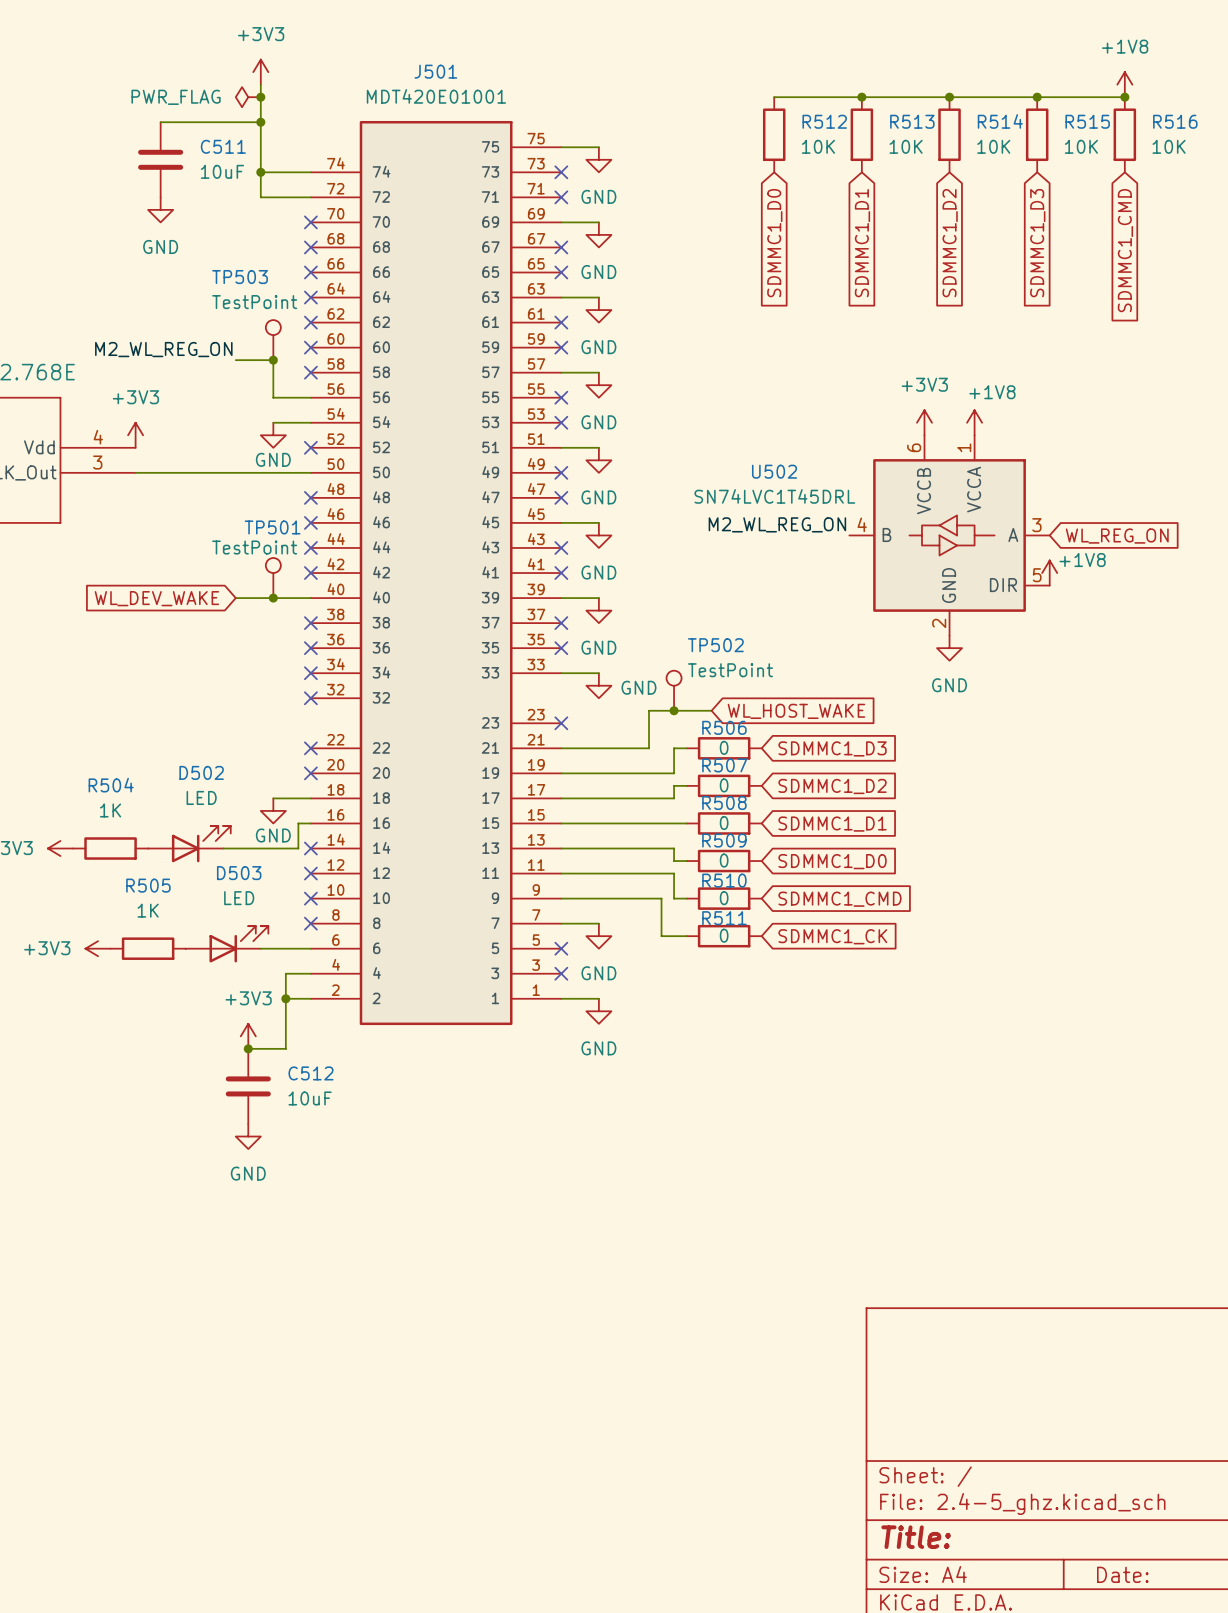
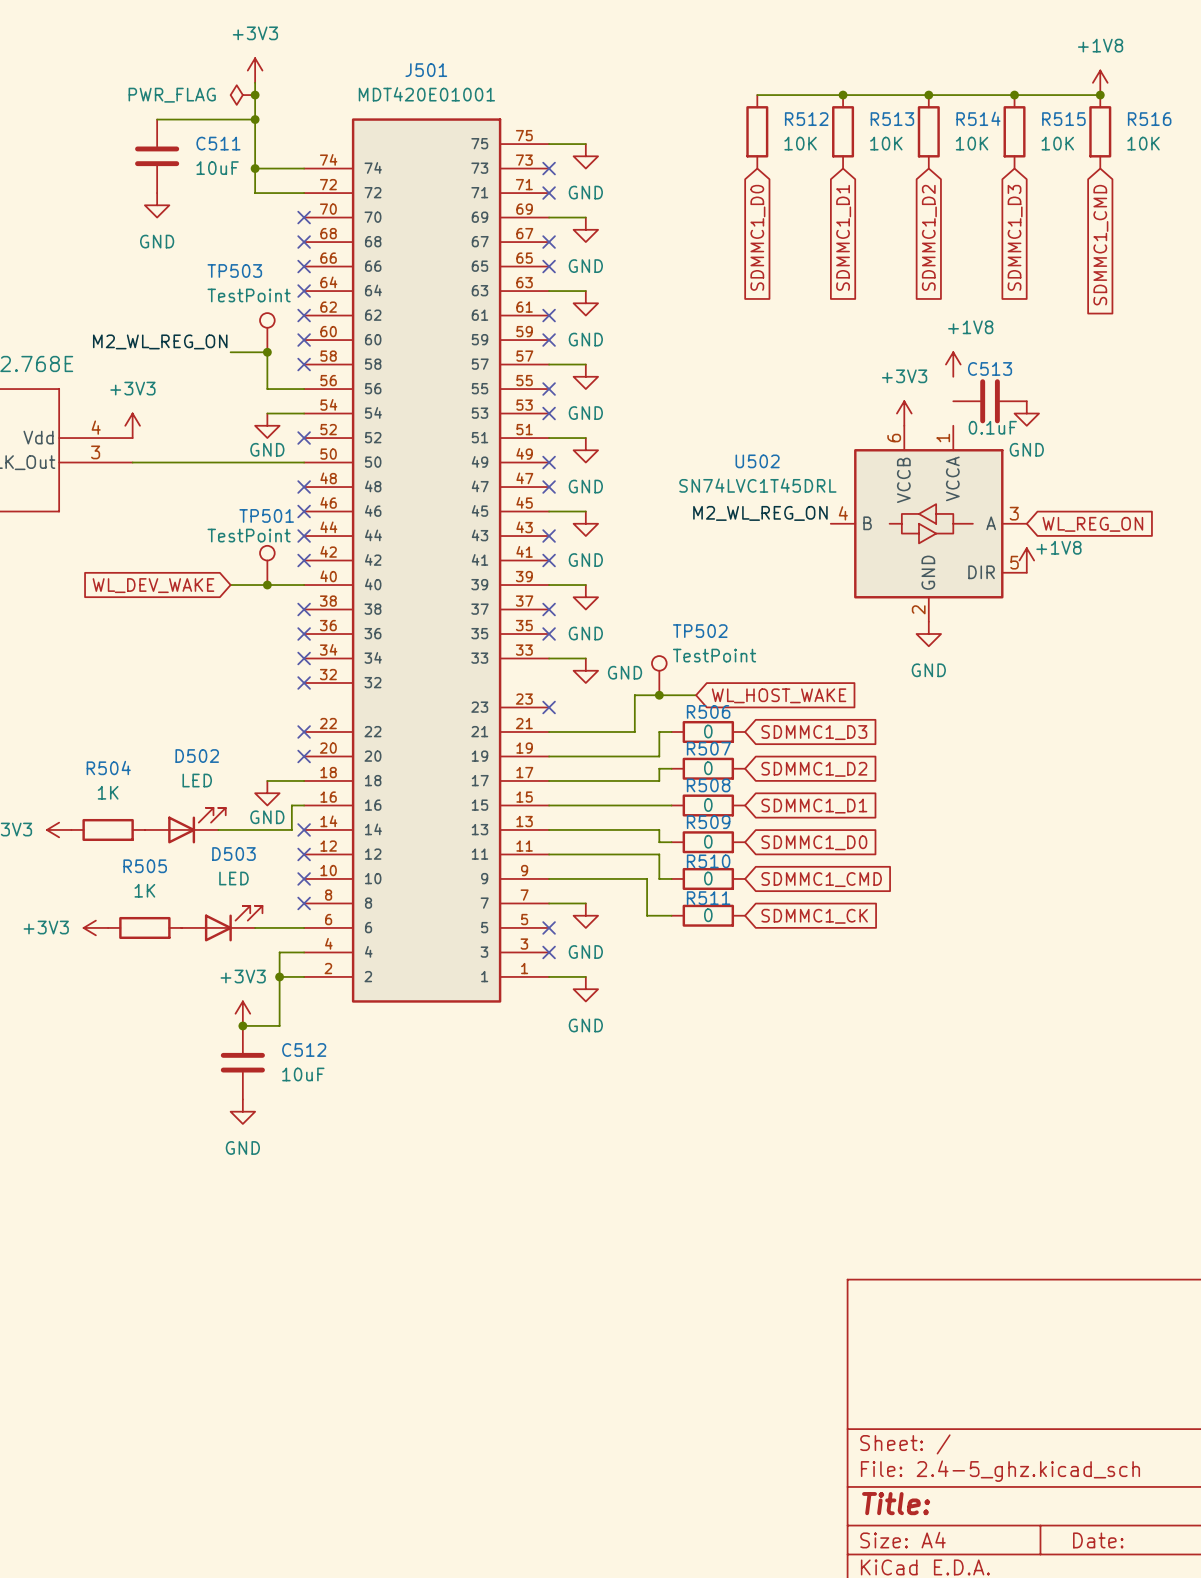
power symbol text position: +1V8 (992, 392) -> +1V8 (970, 327)
C513: none -> 0.1uF (990, 401)
power symbol position: +1V8 (974, 422) -> +1V8 (953, 364)
power symbol: none -> GND (1026, 413)

